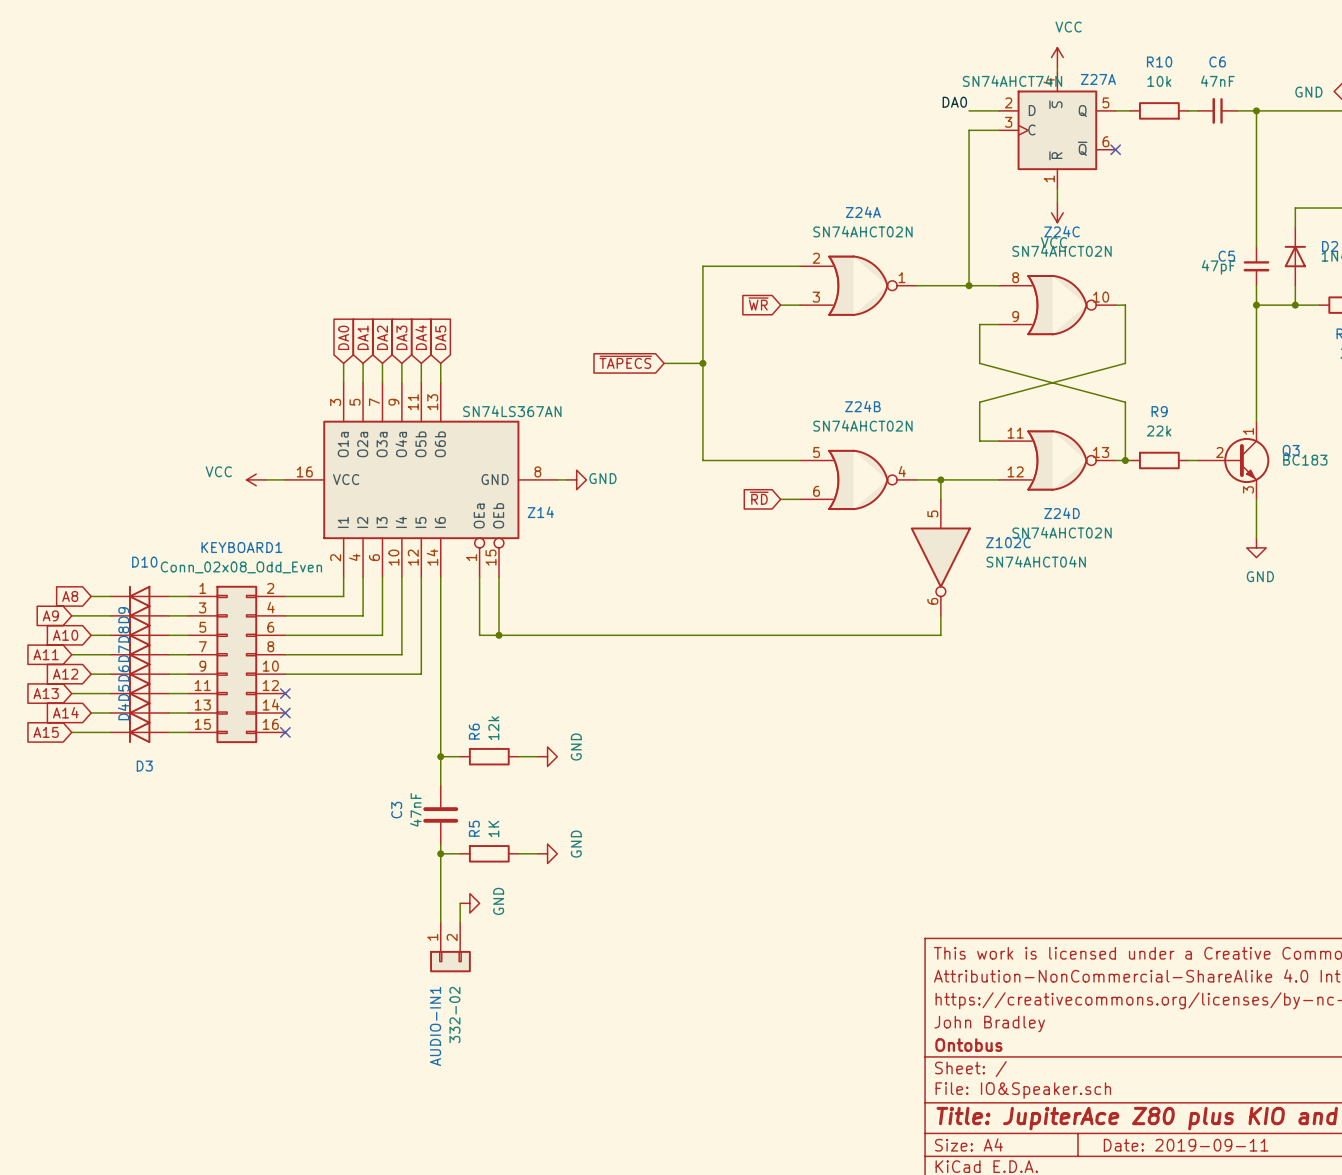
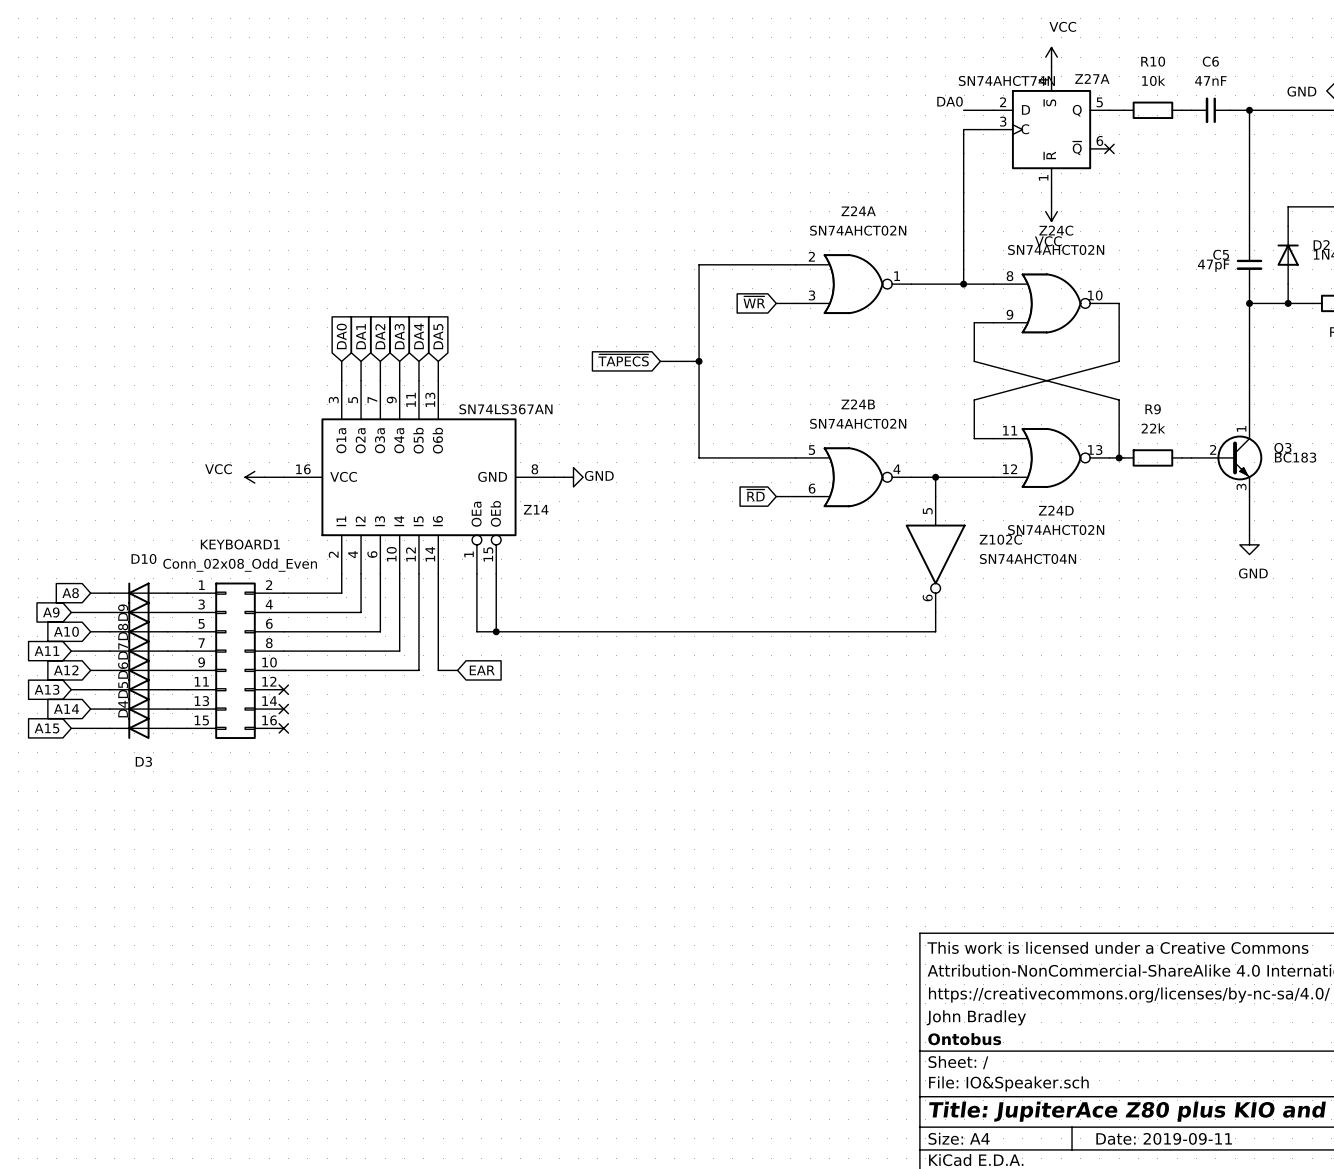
wire: (440, 674) (440, 785) -> (438, 670) (457, 670)
global label: none -> EAR (482, 670)
wire: (440, 756) (460, 756) -> none
junction: (440, 756) -> none
R6: 12k (489, 756) -> none
wire: (518, 756) (537, 756) -> none
power symbol: GND (547, 756) -> none
C3: 47nF (440, 814) -> none
wire: (440, 844) (440, 922) -> none
wire: (440, 853) (460, 853) -> none
junction: (440, 853) -> none
R5: 1K (489, 853) -> none
wire: (518, 853) (537, 853) -> none
power symbol: GND (547, 853) -> none
wire: (460, 903) (460, 922) -> none
power symbol: GND (469, 903) -> none
AUDIO-IN1: 332-02 (450, 947) -> none

